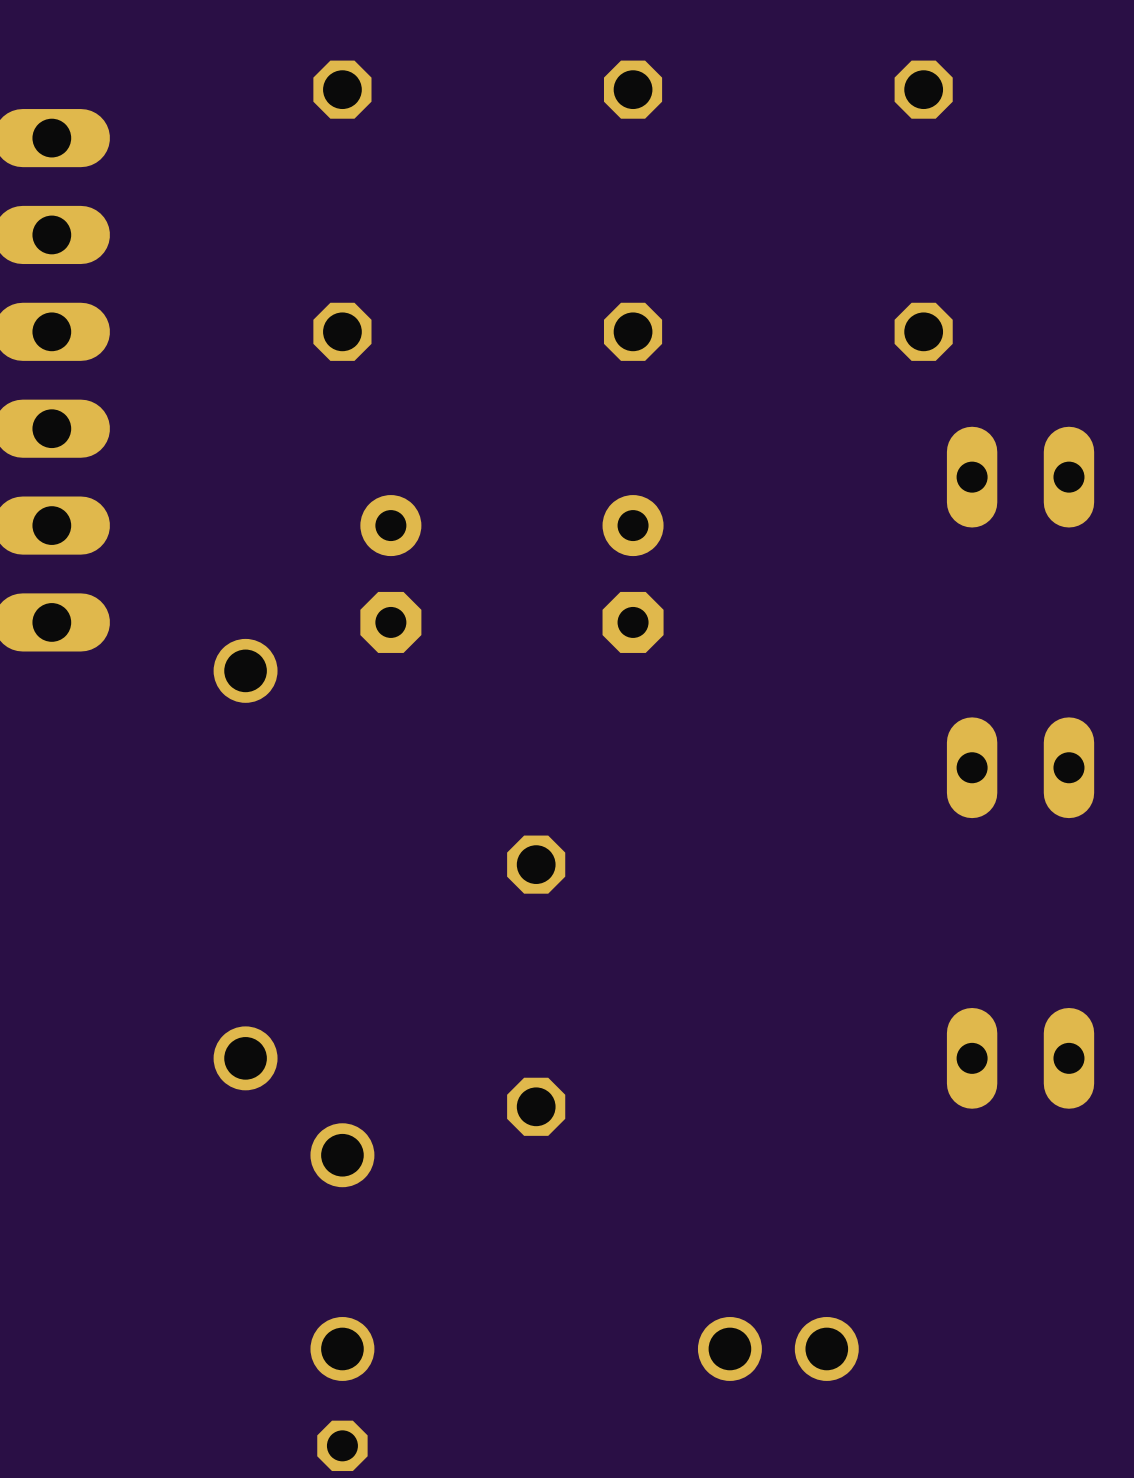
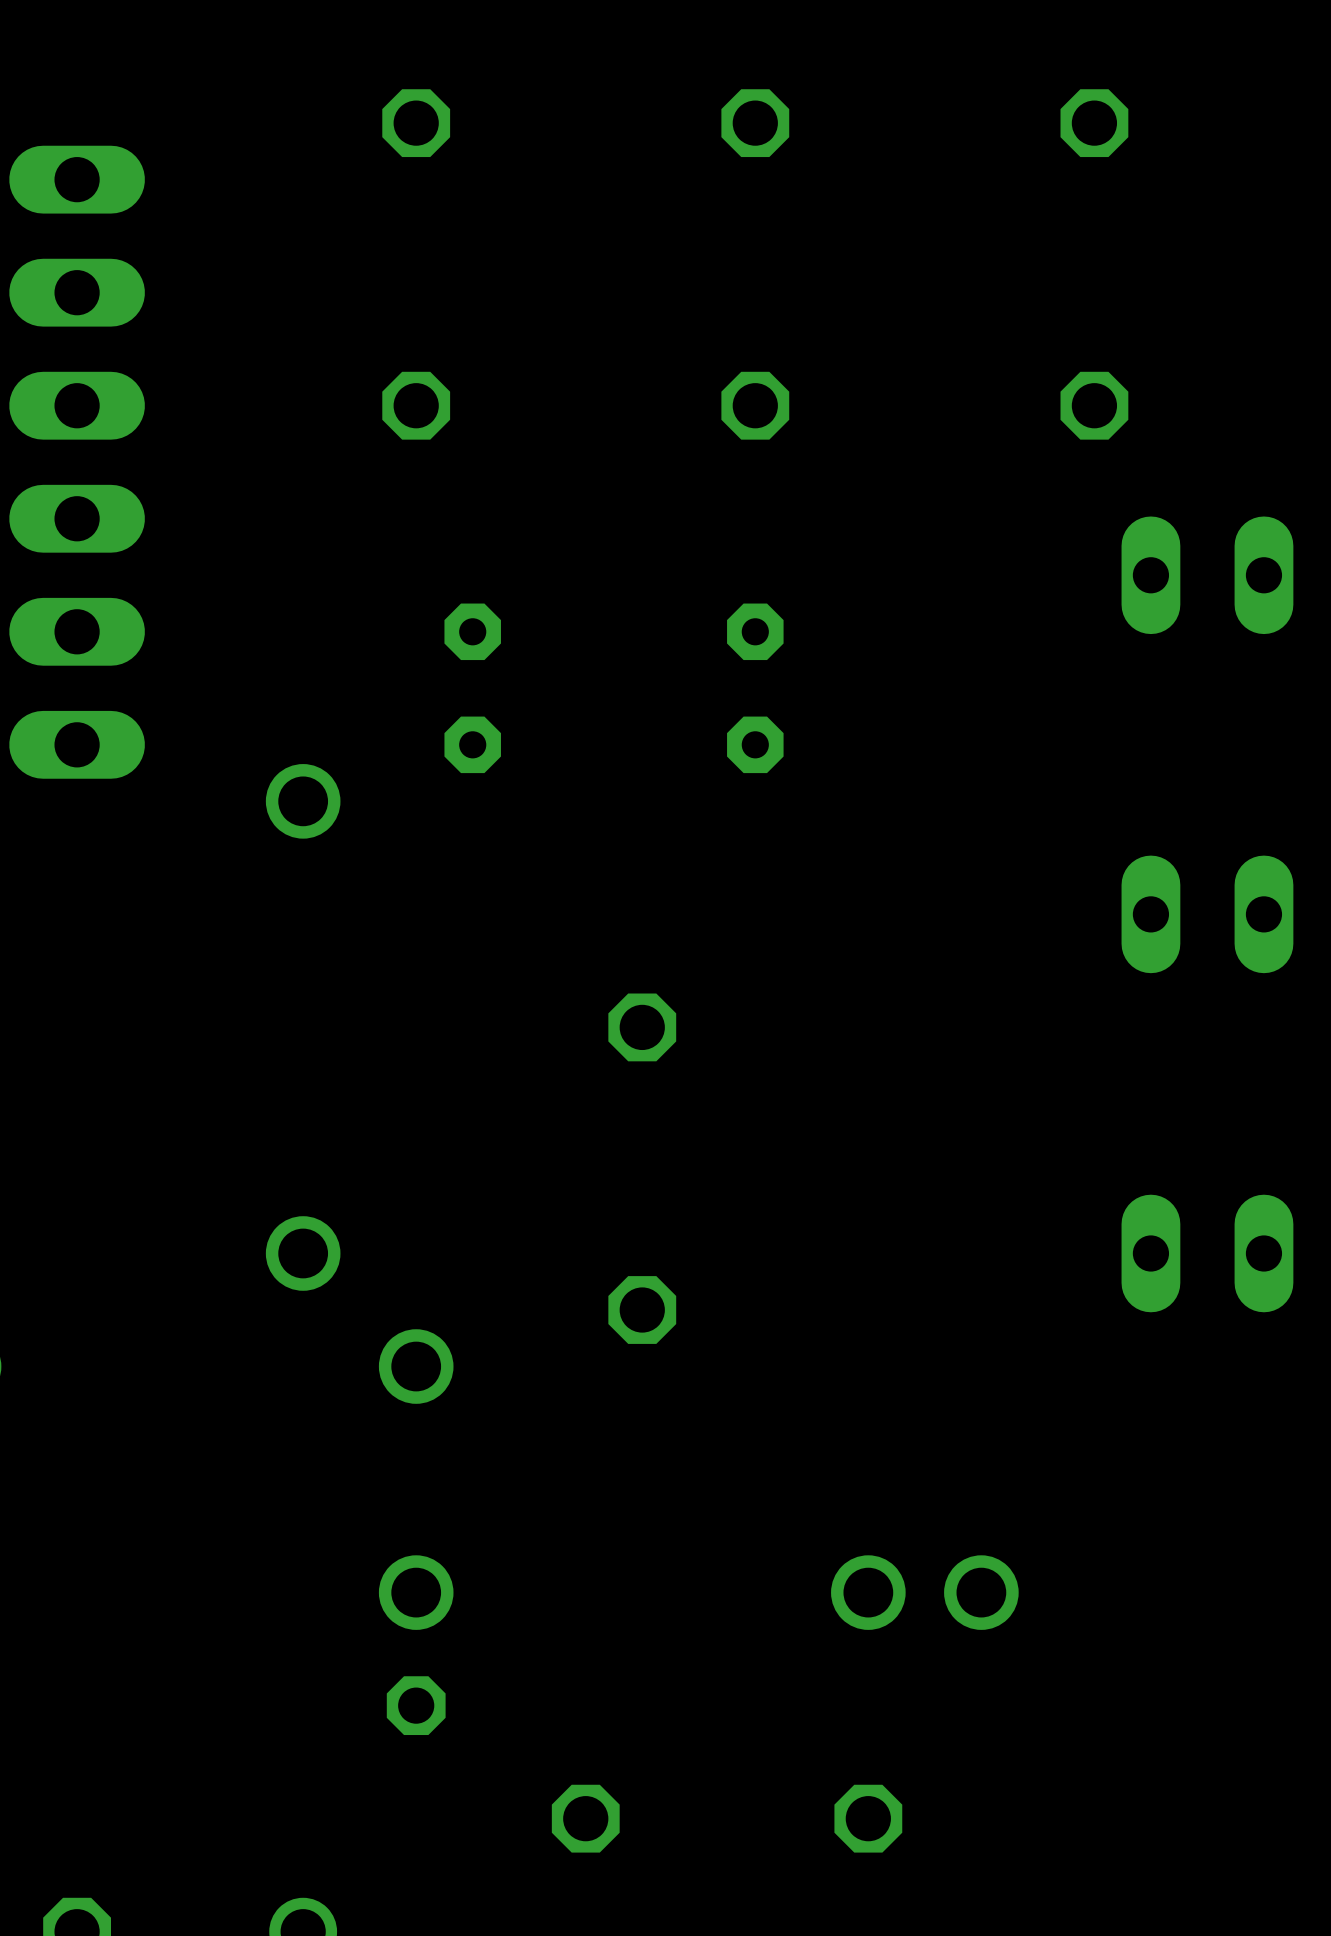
part footprint: [360, 495, 422, 653] -> [444, 603, 501, 774]
part footprint: [602, 495, 664, 653] -> [727, 603, 784, 774]

